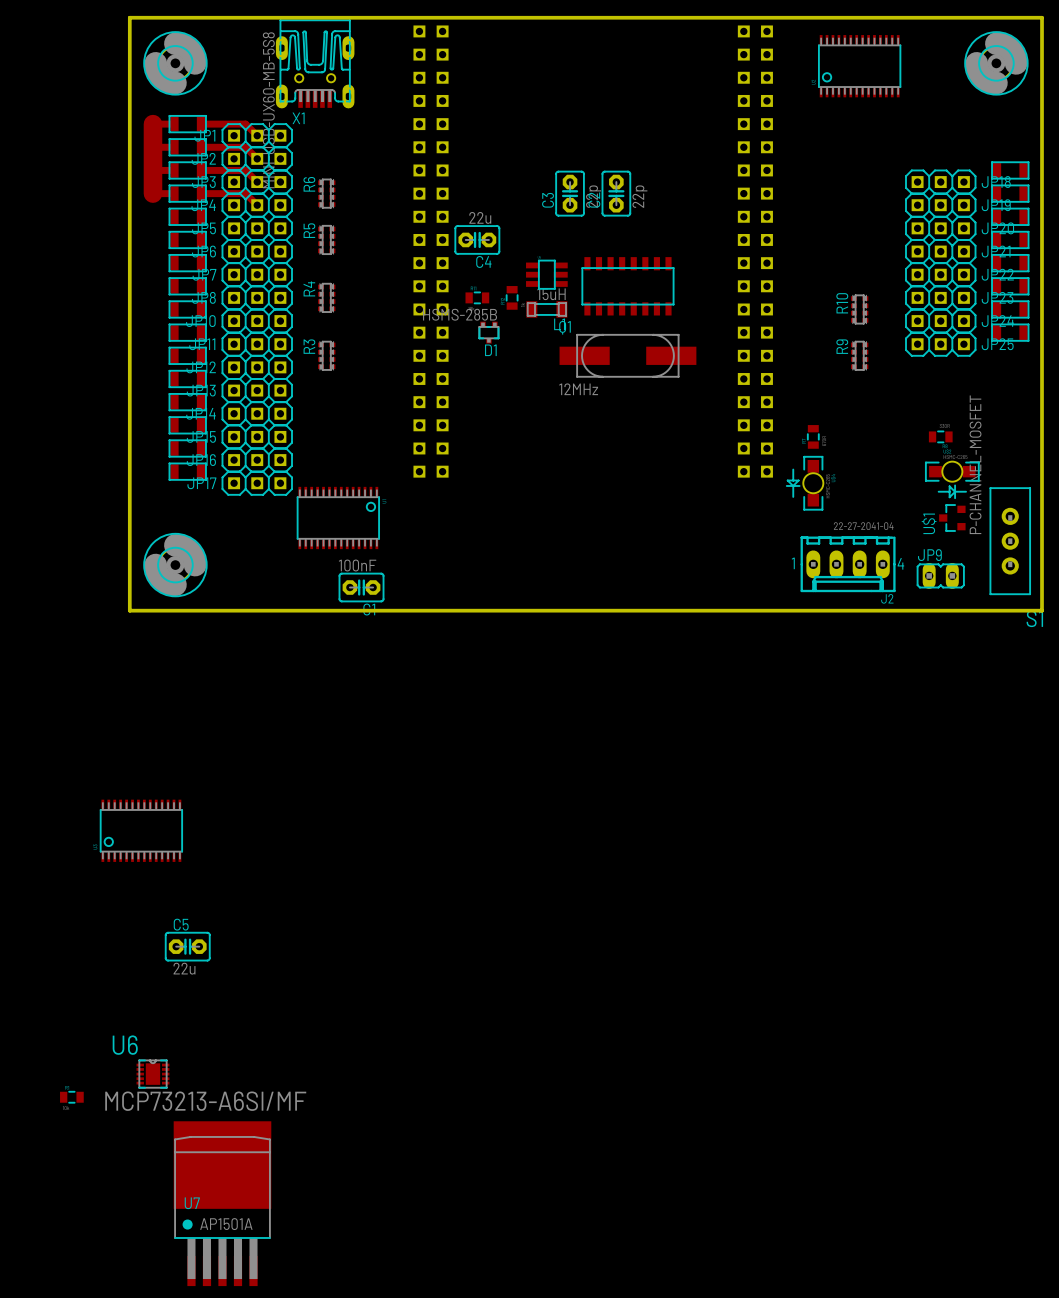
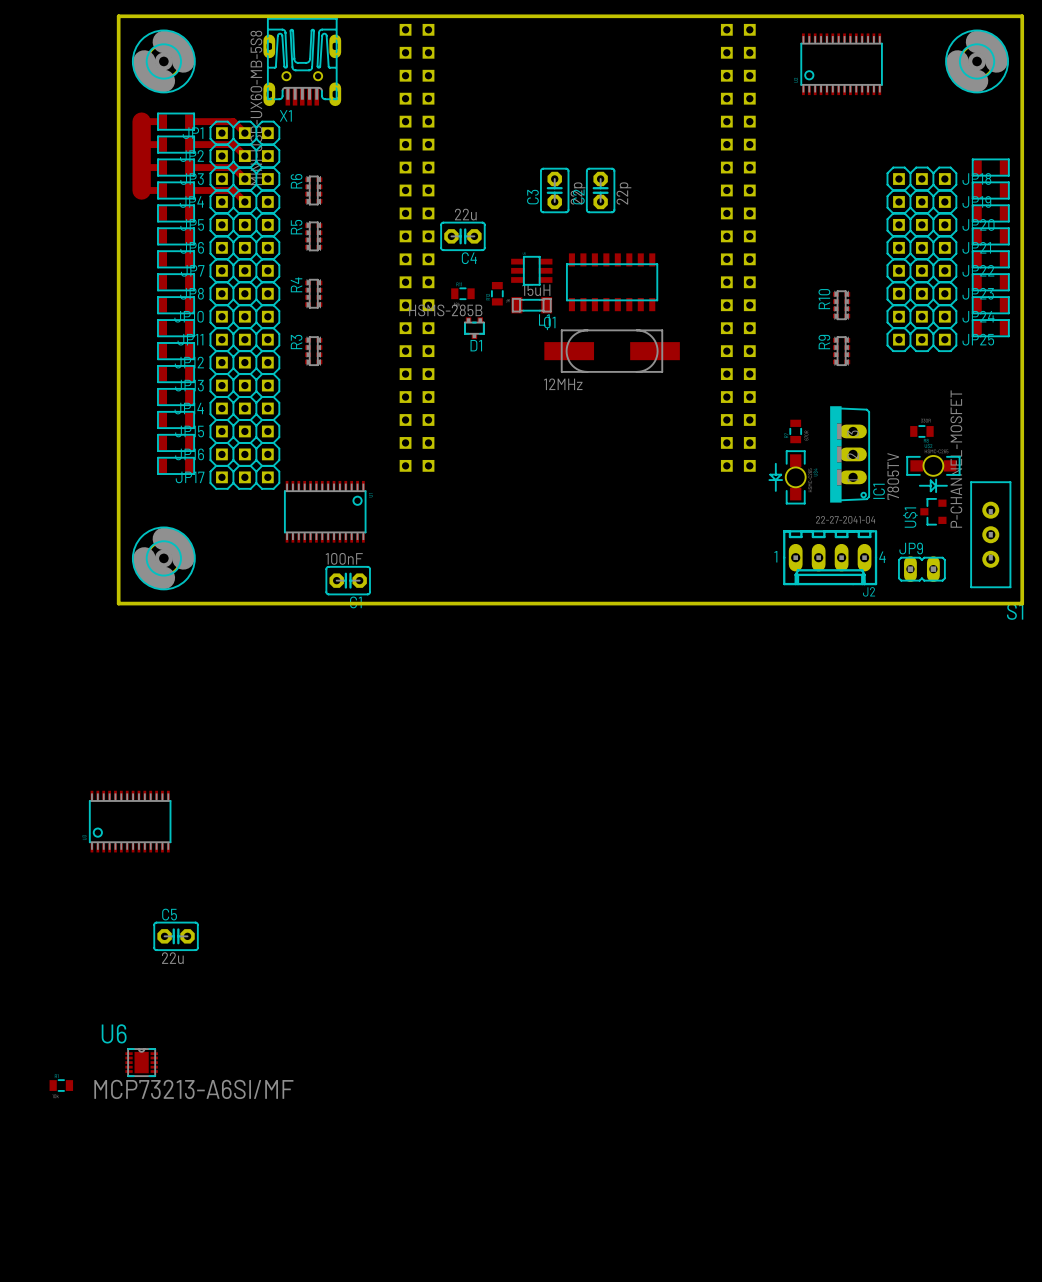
IC1: none -> 7805TV (849, 454)
U7: AP1501A (222, 1203) -> none

